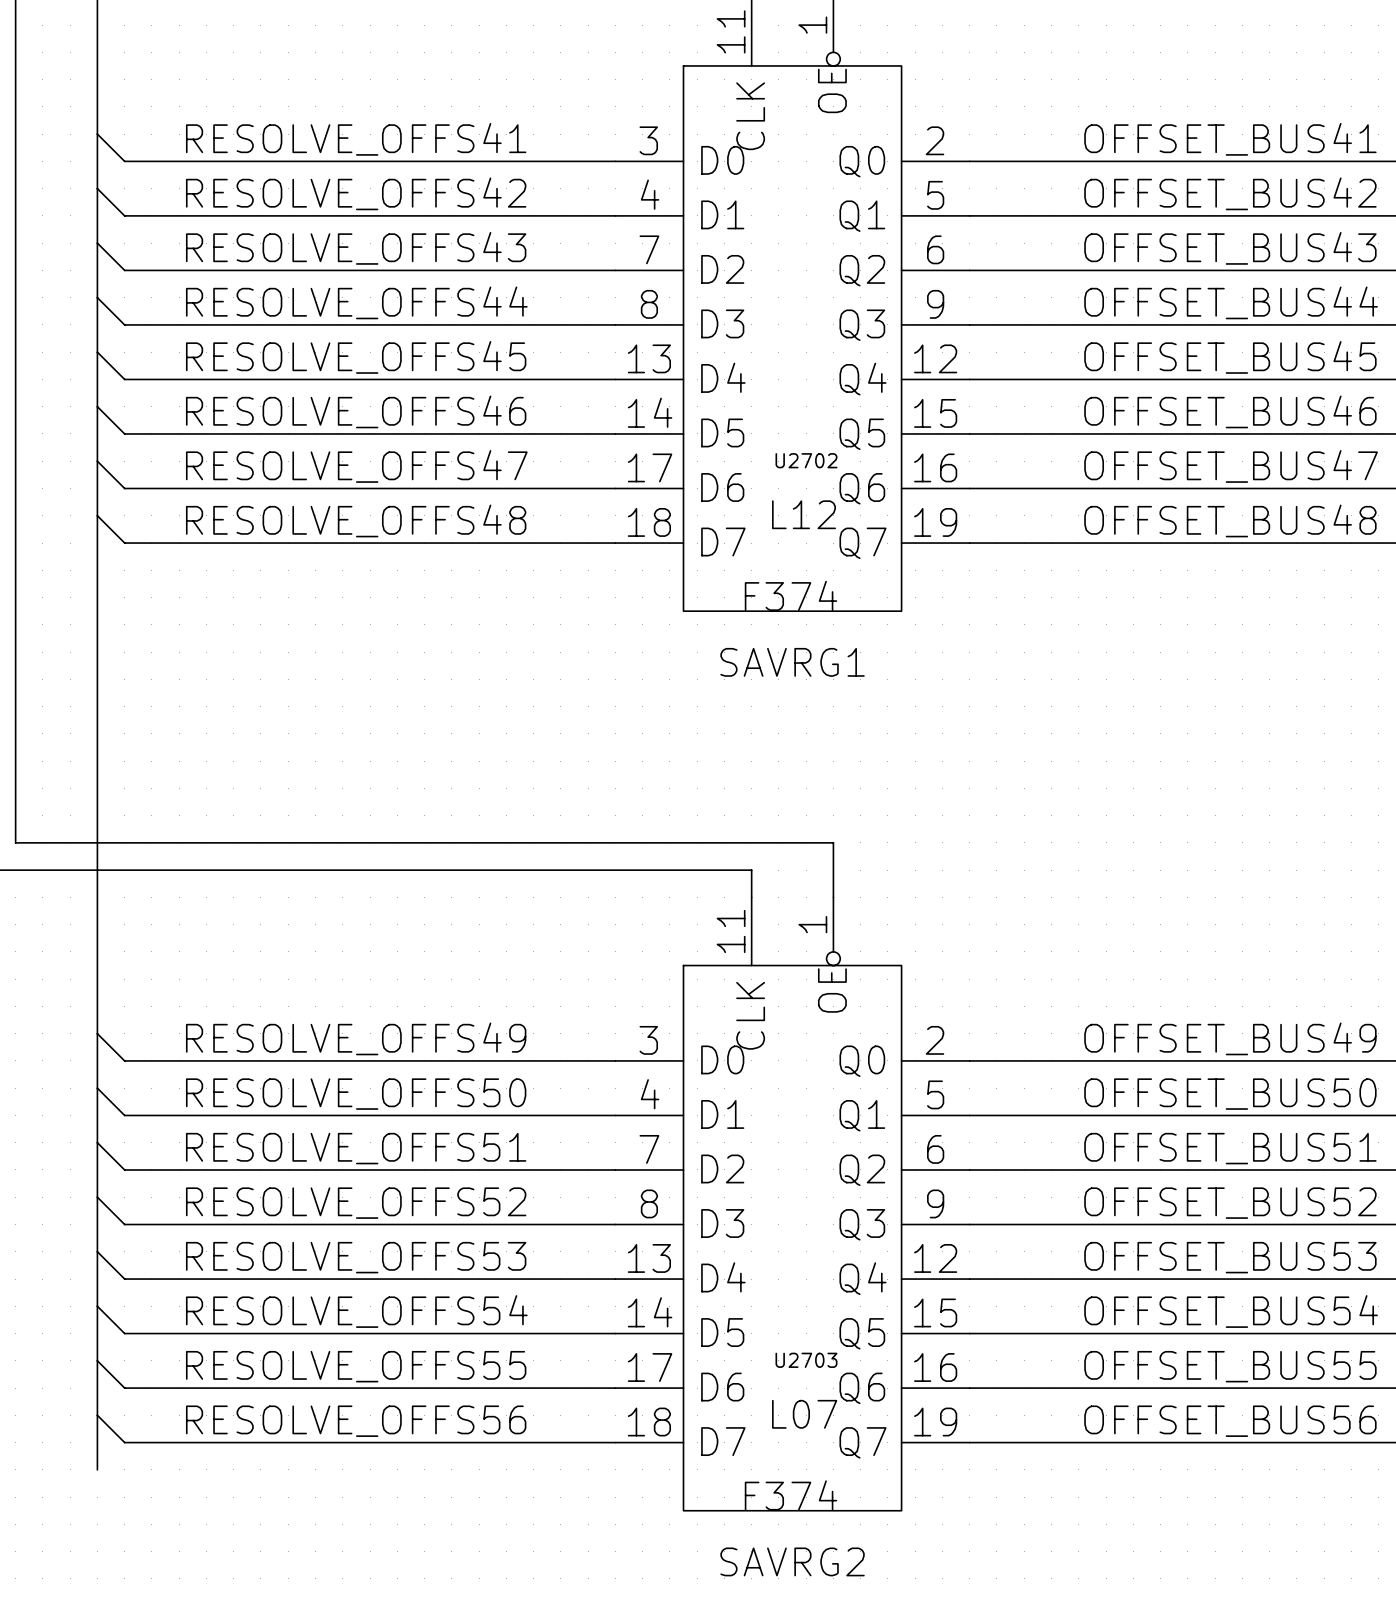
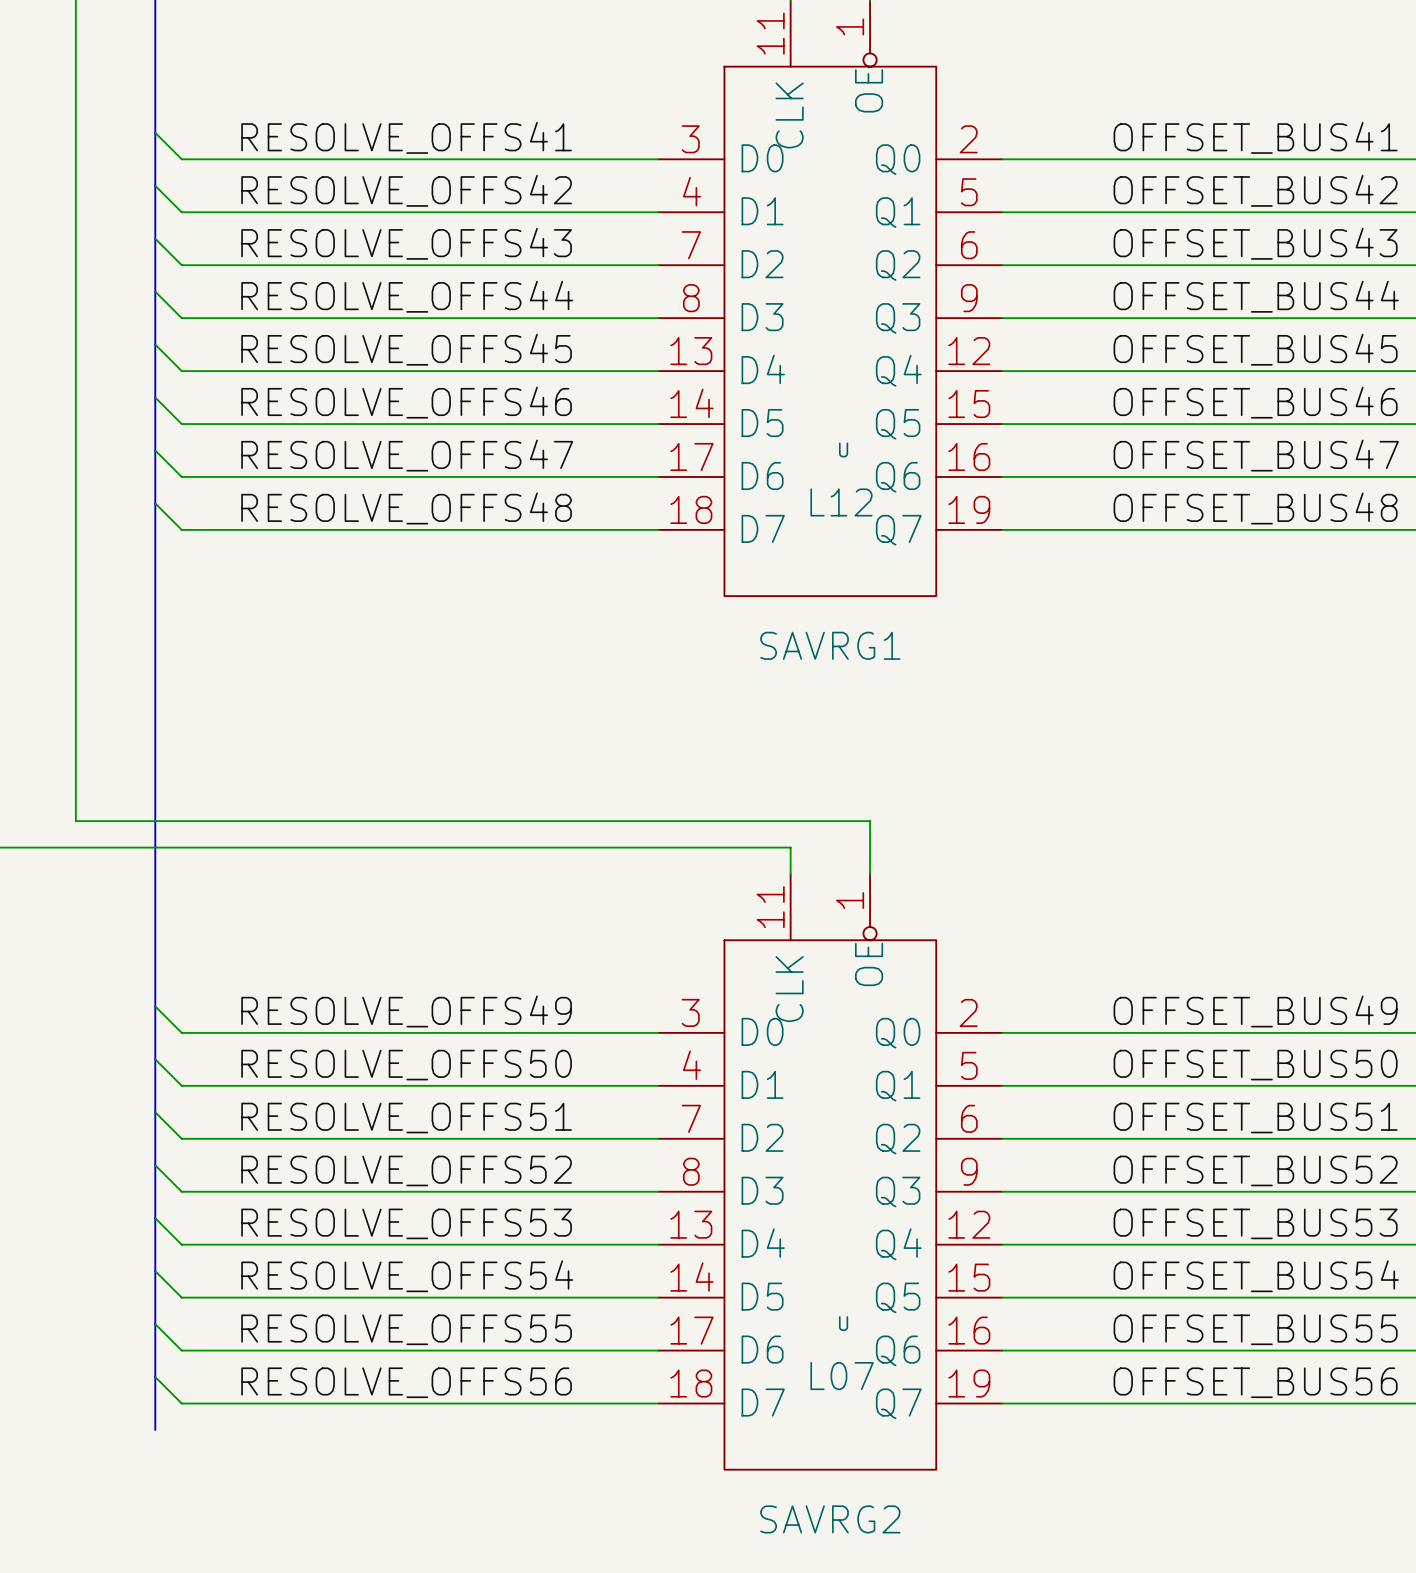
U2702 name: U2702 (806, 460) -> U (843, 450)
U2702 value: F374 (791, 595) -> none
U2703 name: U2703 (806, 1360) -> U (843, 1323)
U2703 value: F374 (791, 1495) -> none

